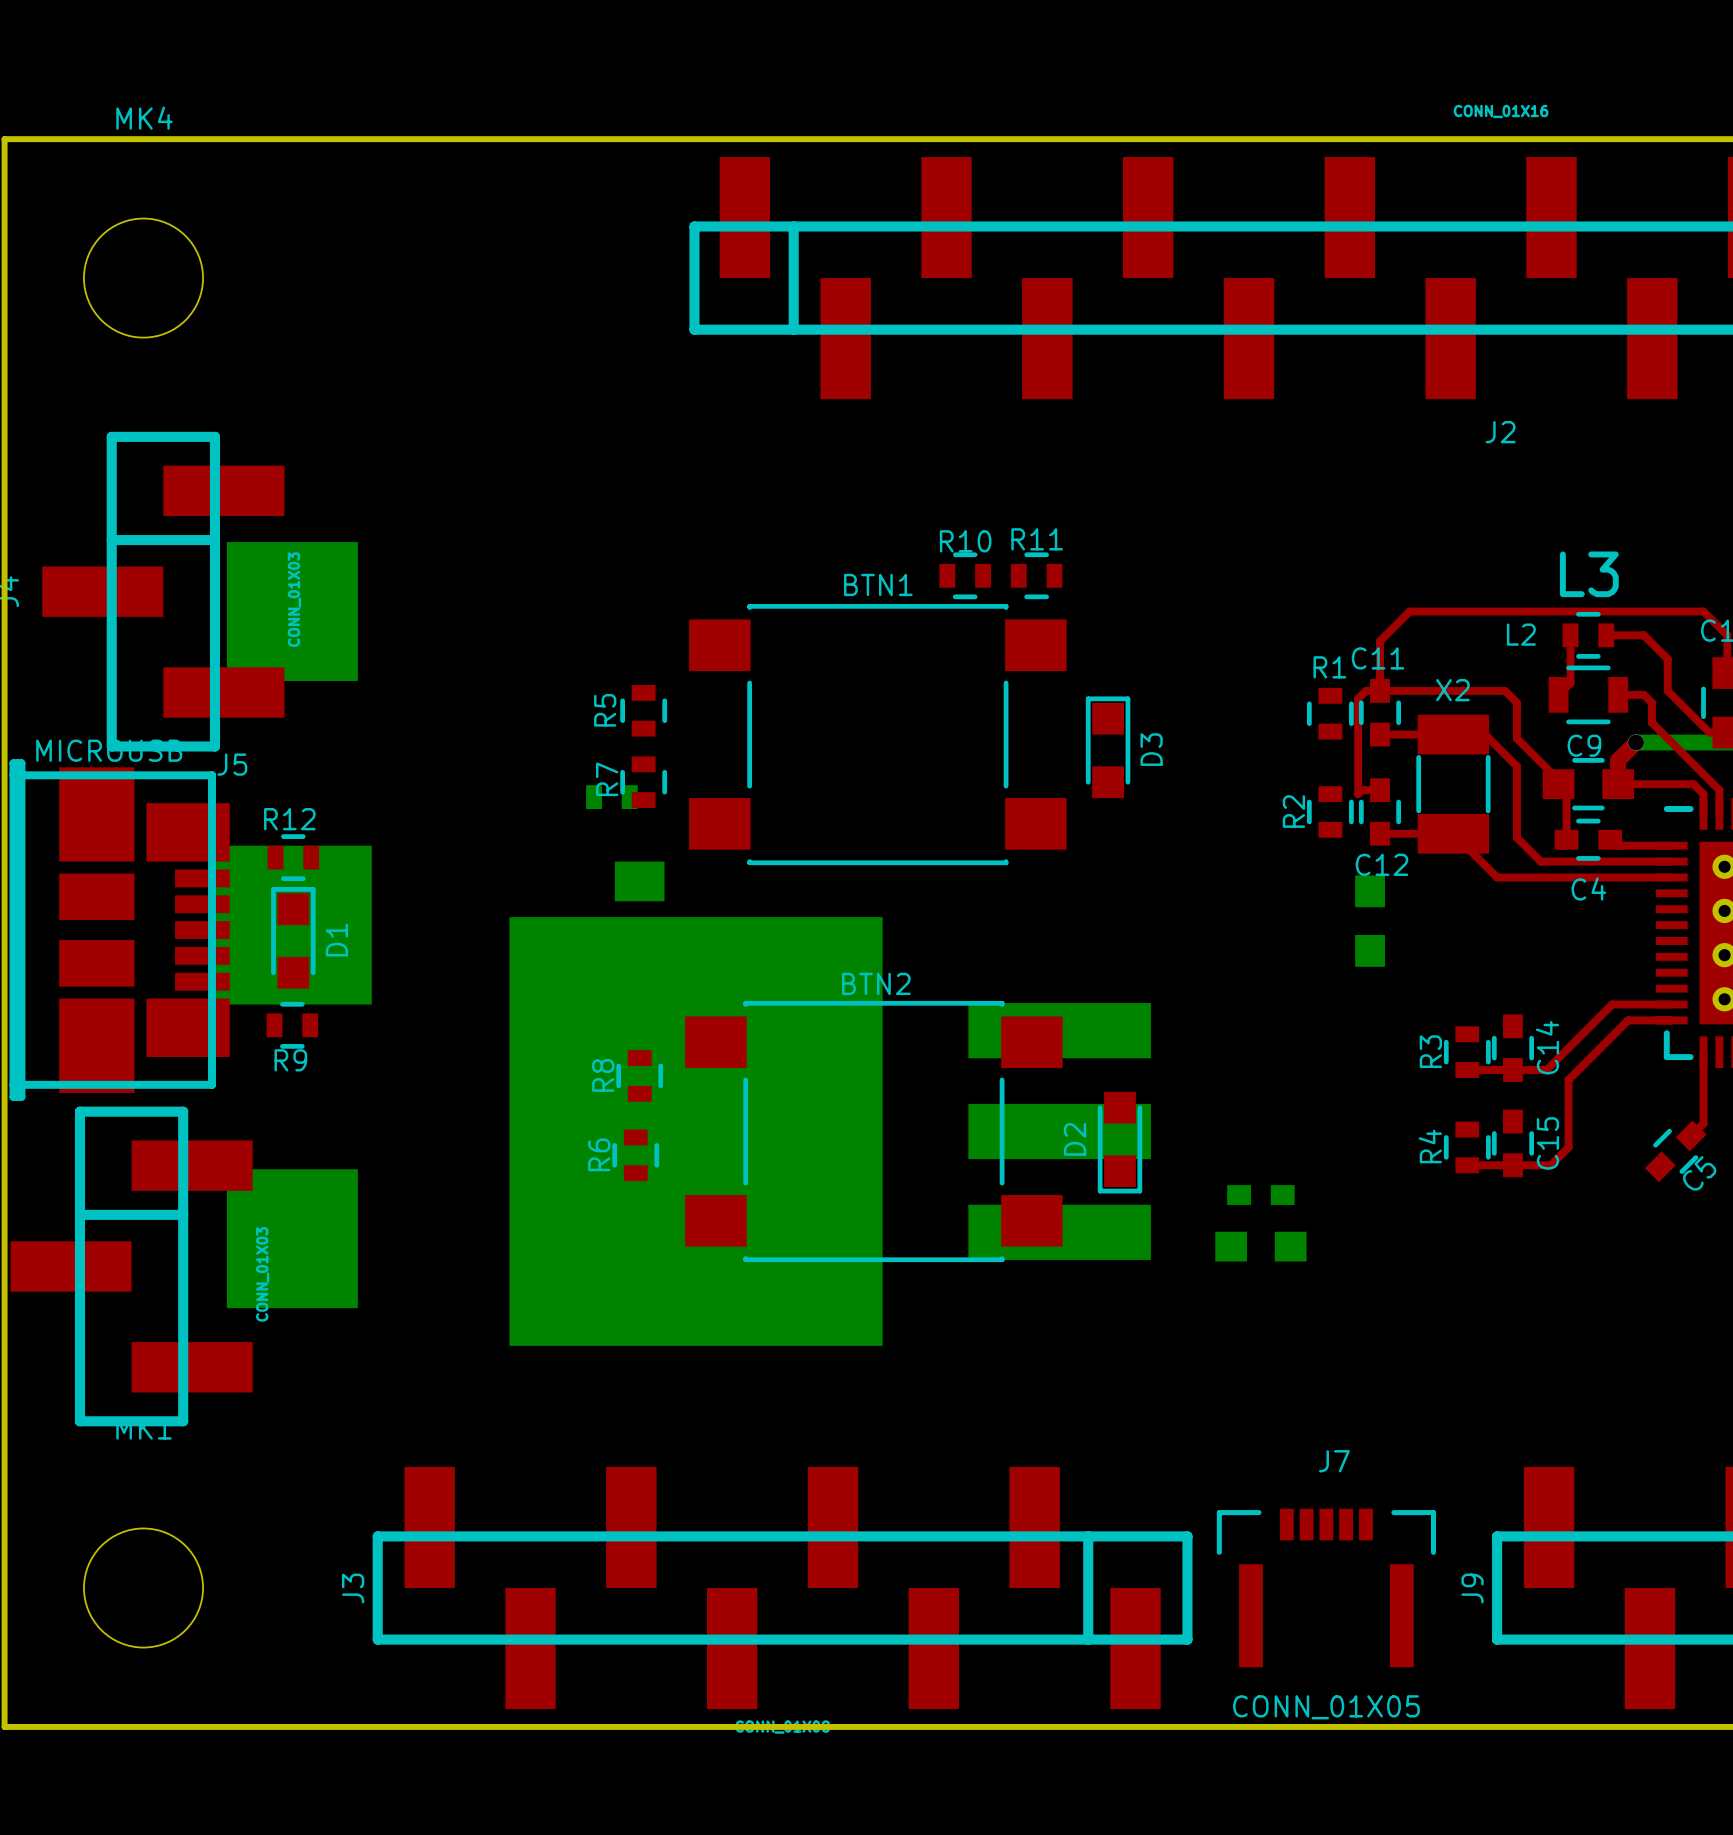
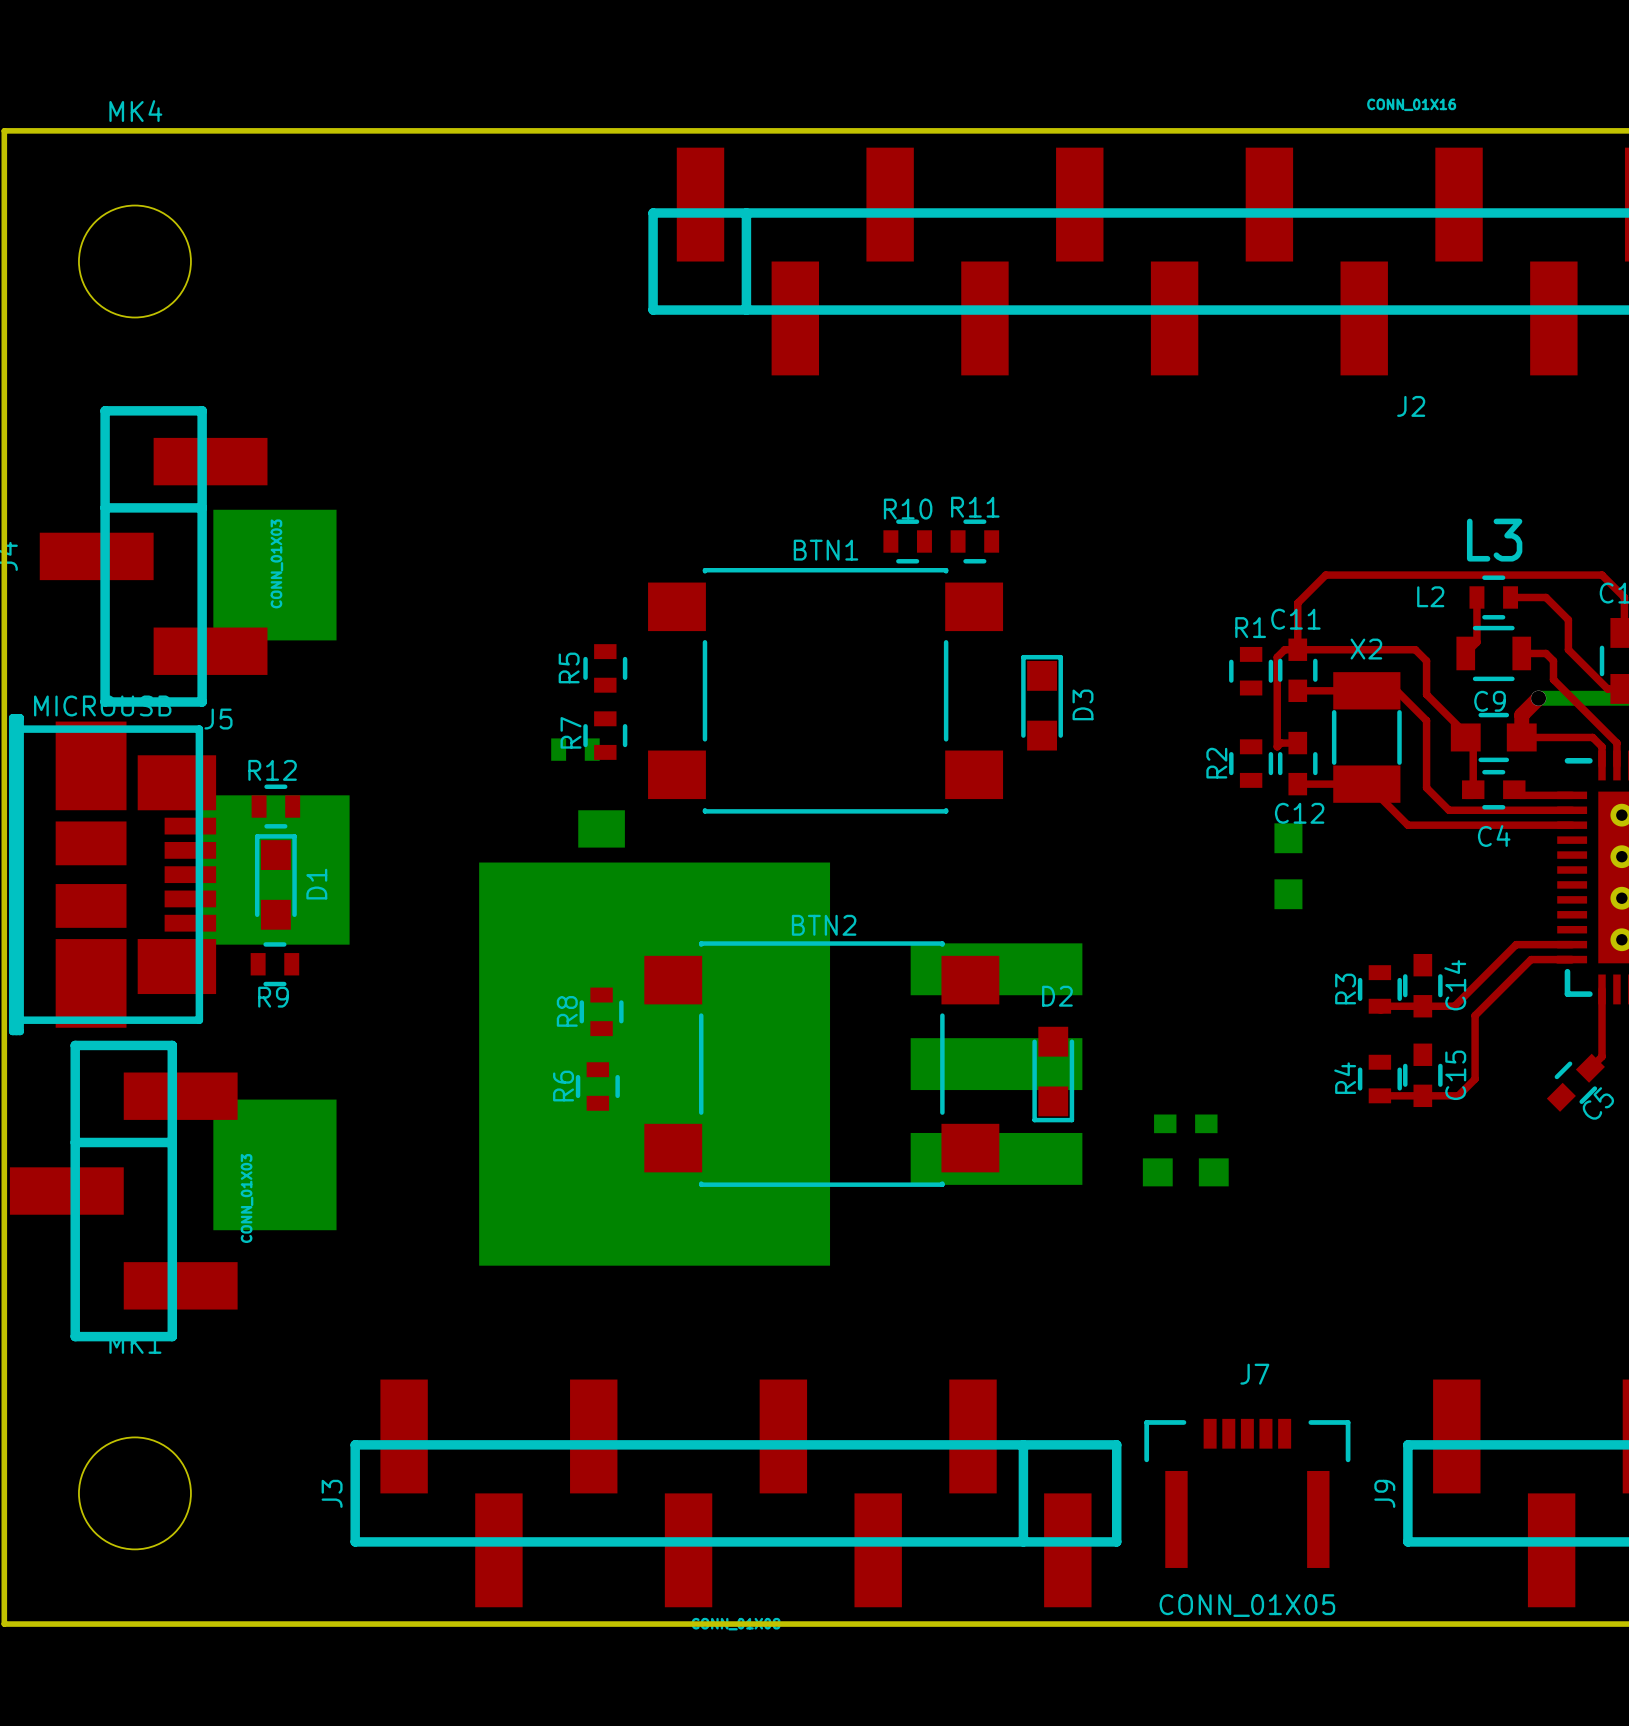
D2 name rotation: 0° (1074, 1139) -> 90° clockwise (1057, 996)
D2 name position: D2 (1074, 1139) -> D2 (1057, 996)

